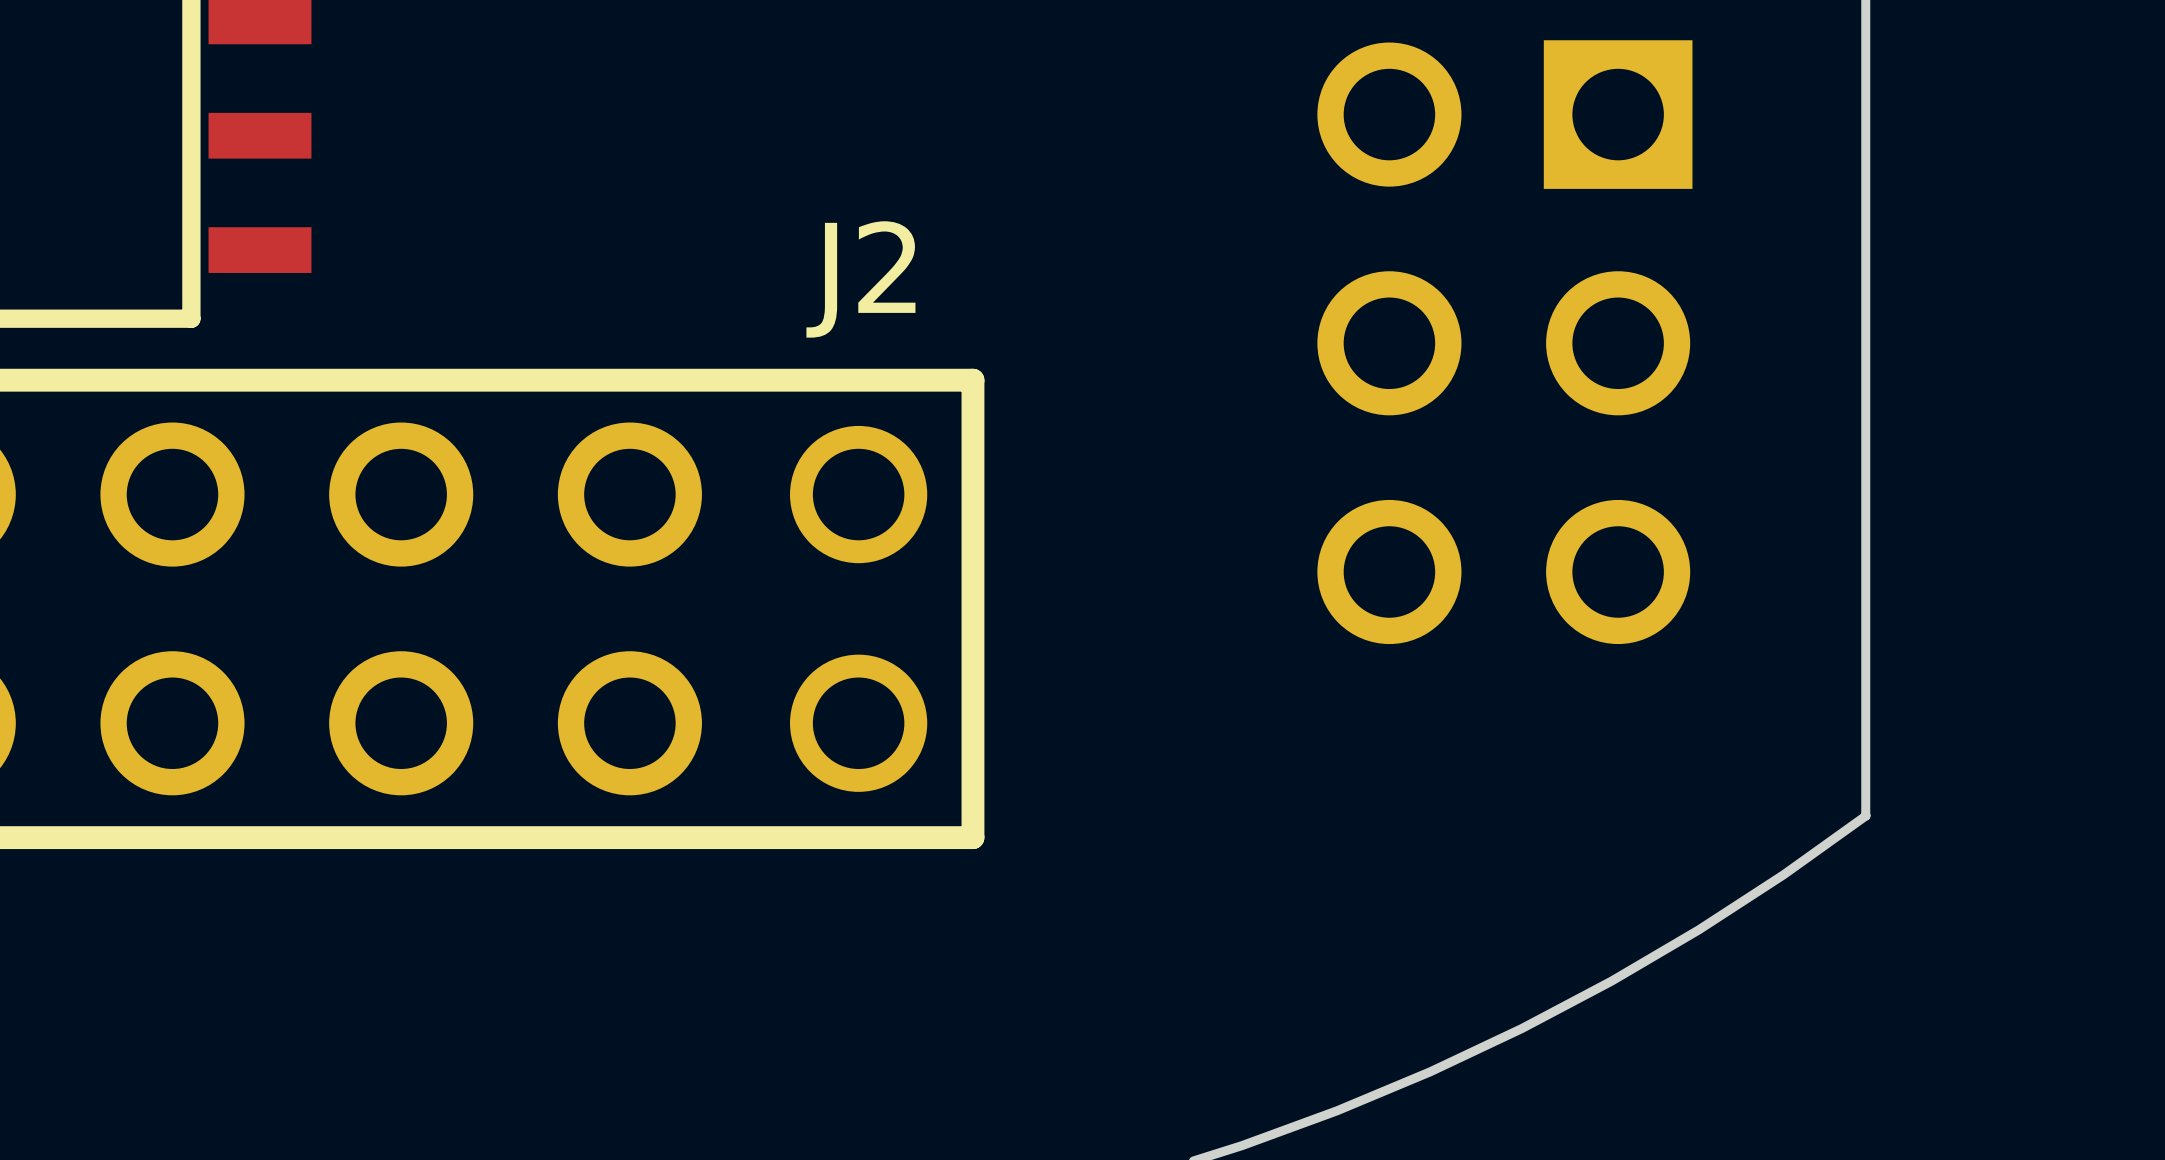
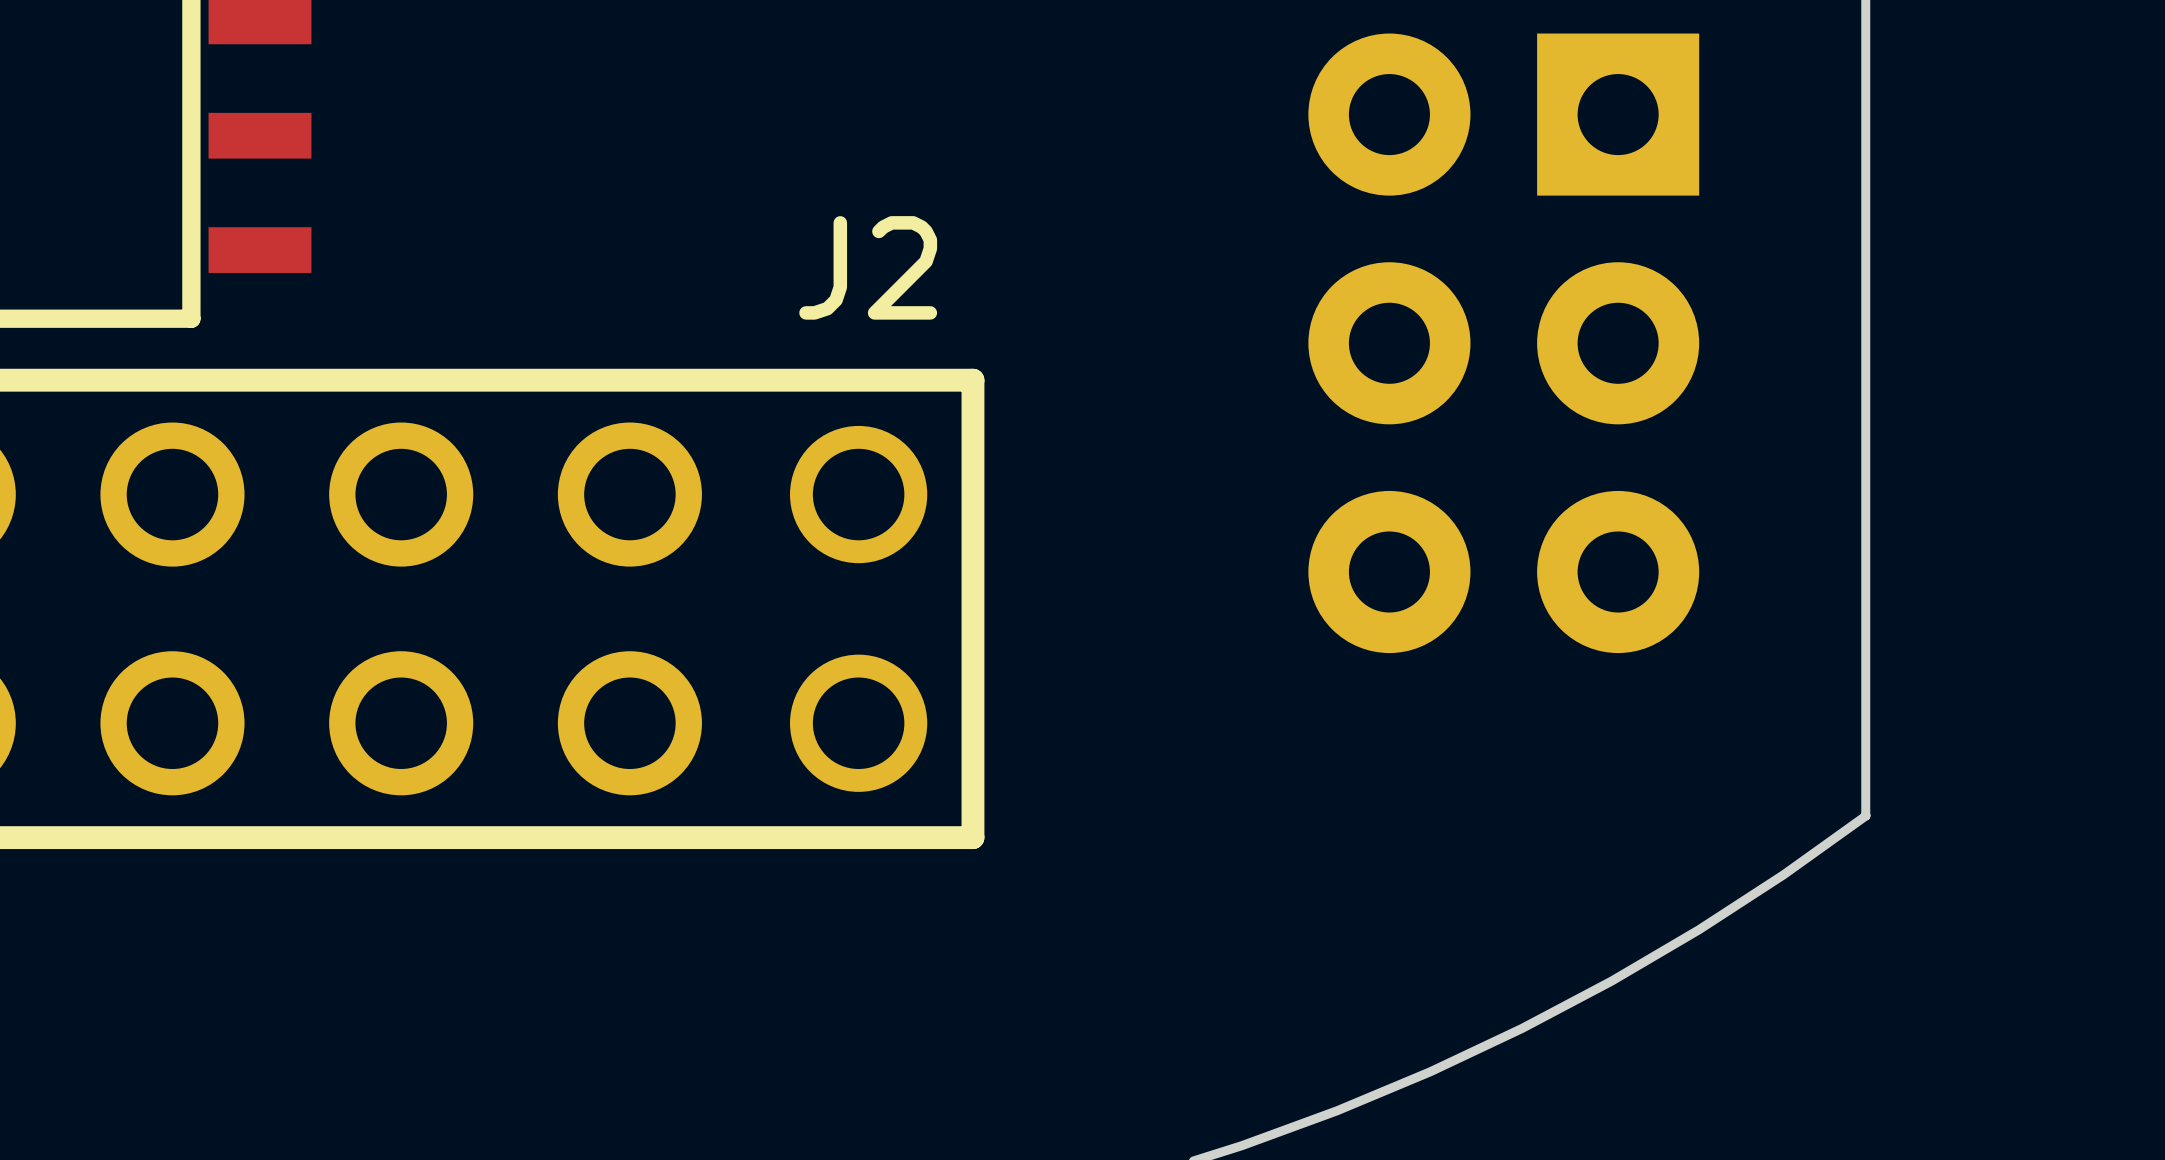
part footprint: [1317, 40, 1693, 645] -> [1308, 33, 1700, 654]

